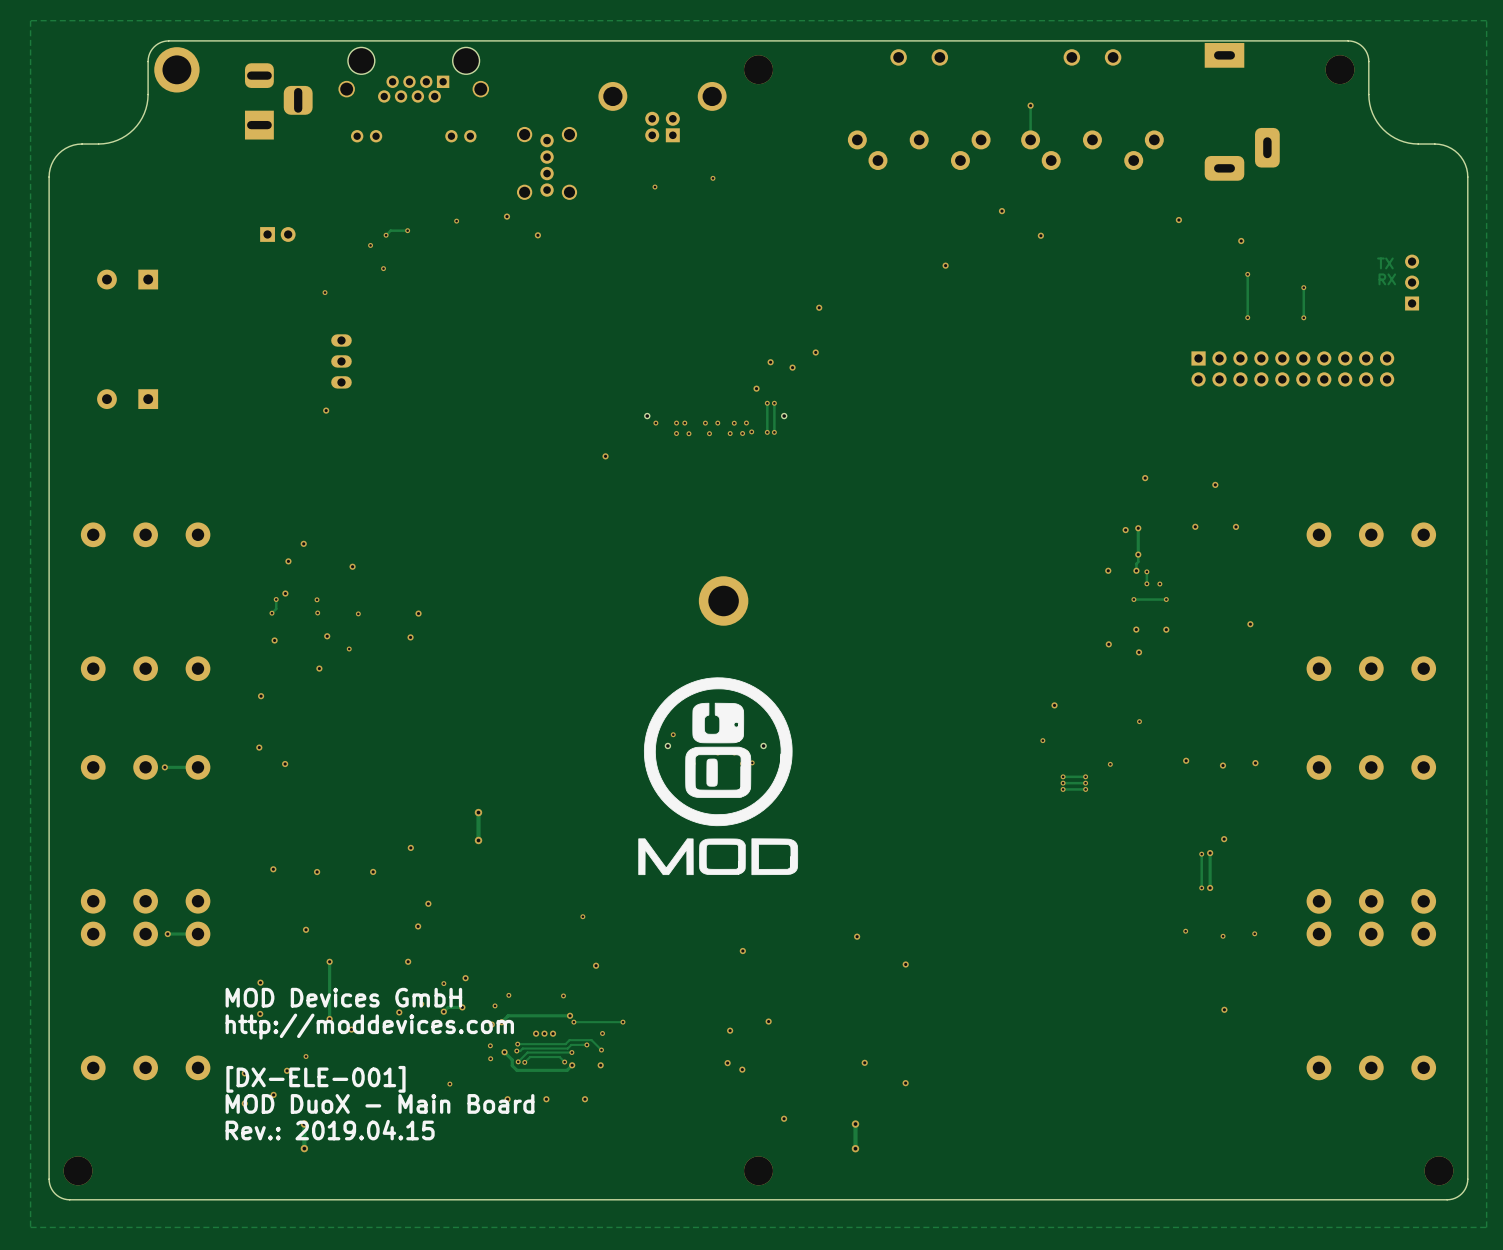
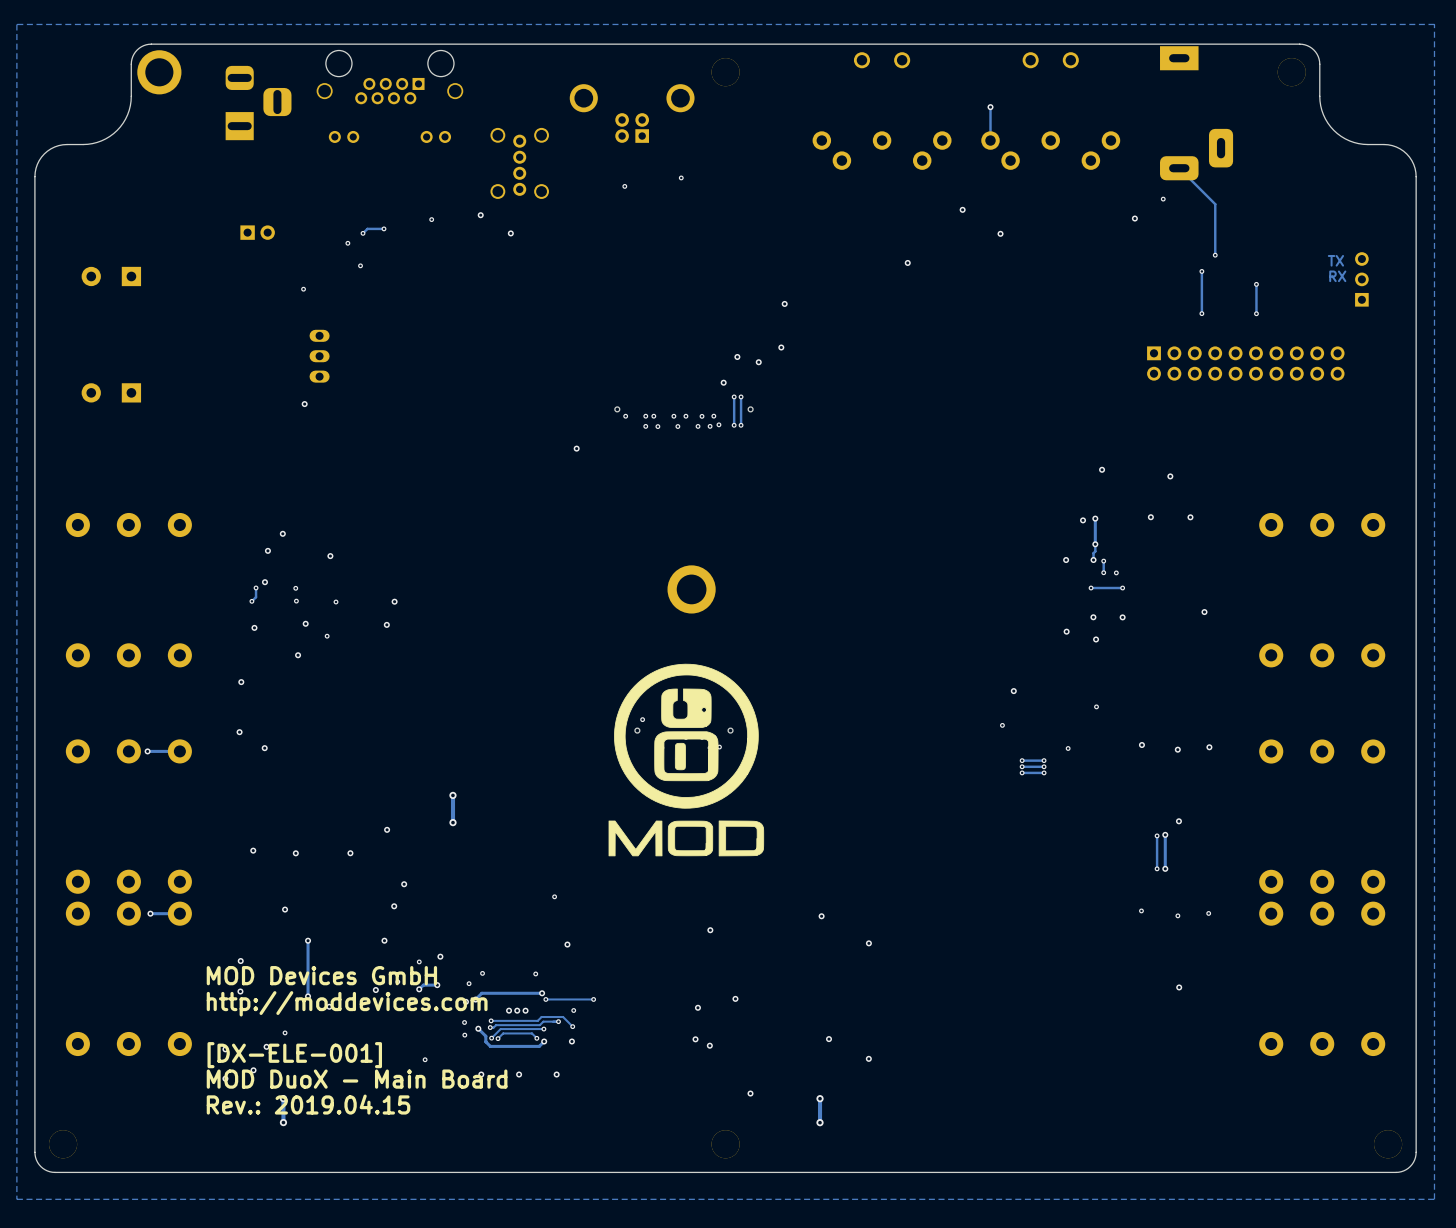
track: none -> (1179, 168) (1215, 204) (1215, 255)
via: none -> (1163, 199)
via: (1241, 241) -> none
via: none -> (1215, 255)

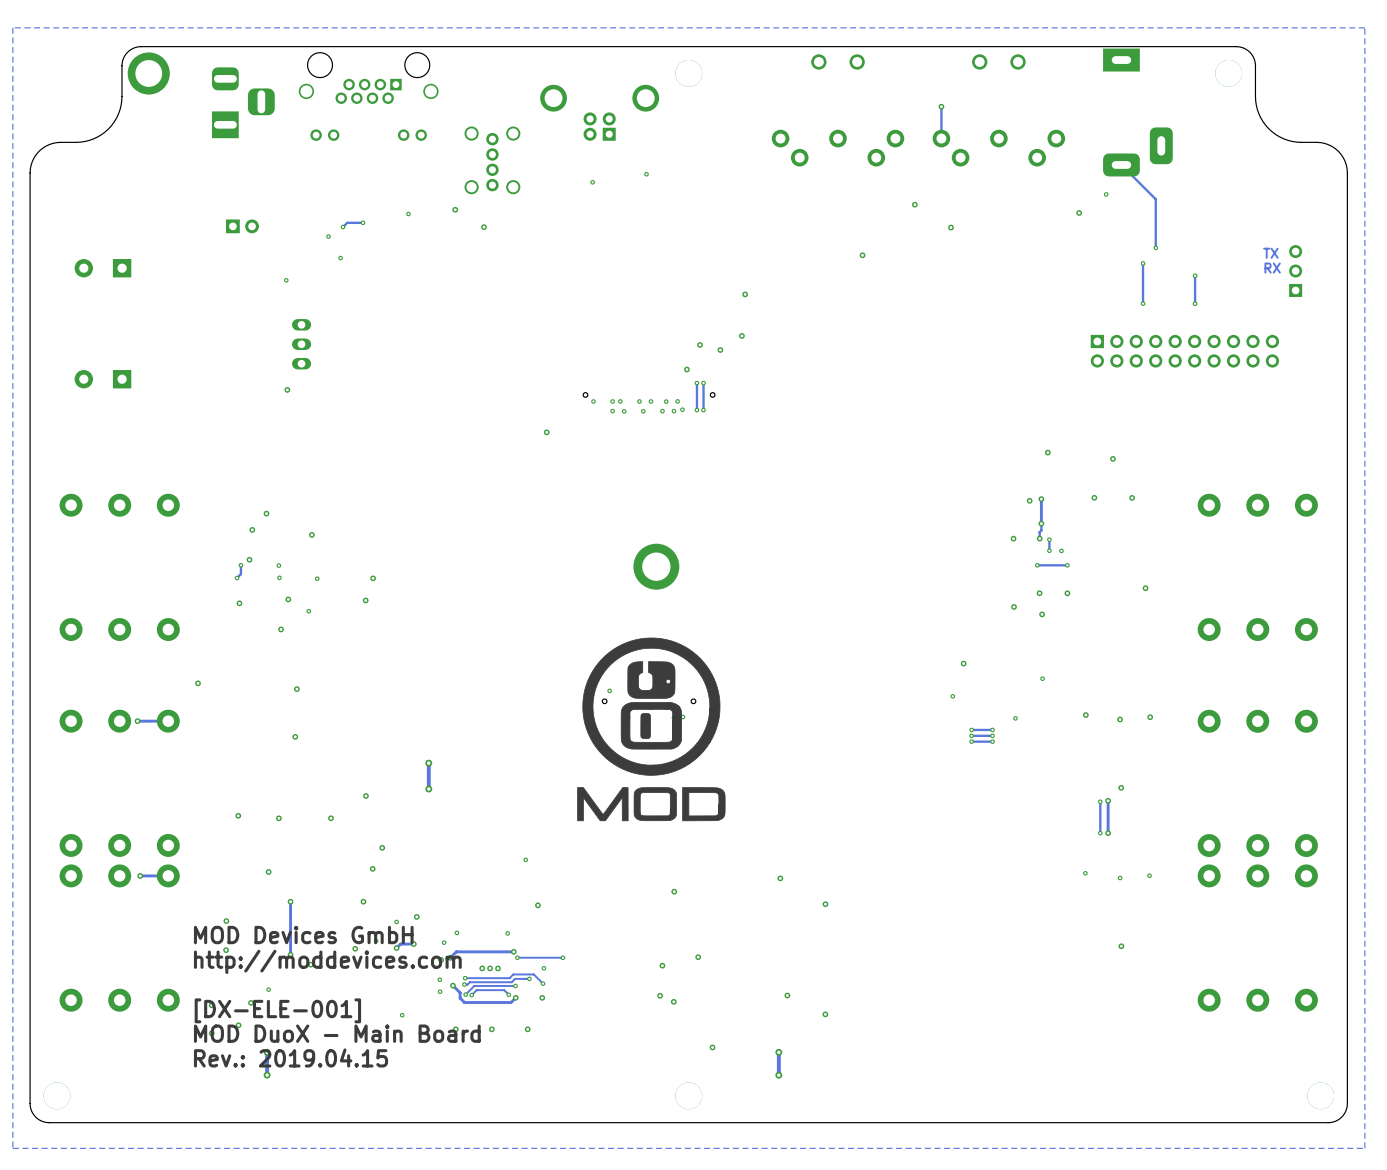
via: (241, 682) -> none
via: none -> (198, 683)
via: none -> (296, 689)
via: (239, 732) -> none
via: (264, 748) -> none
via: none -> (295, 736)

